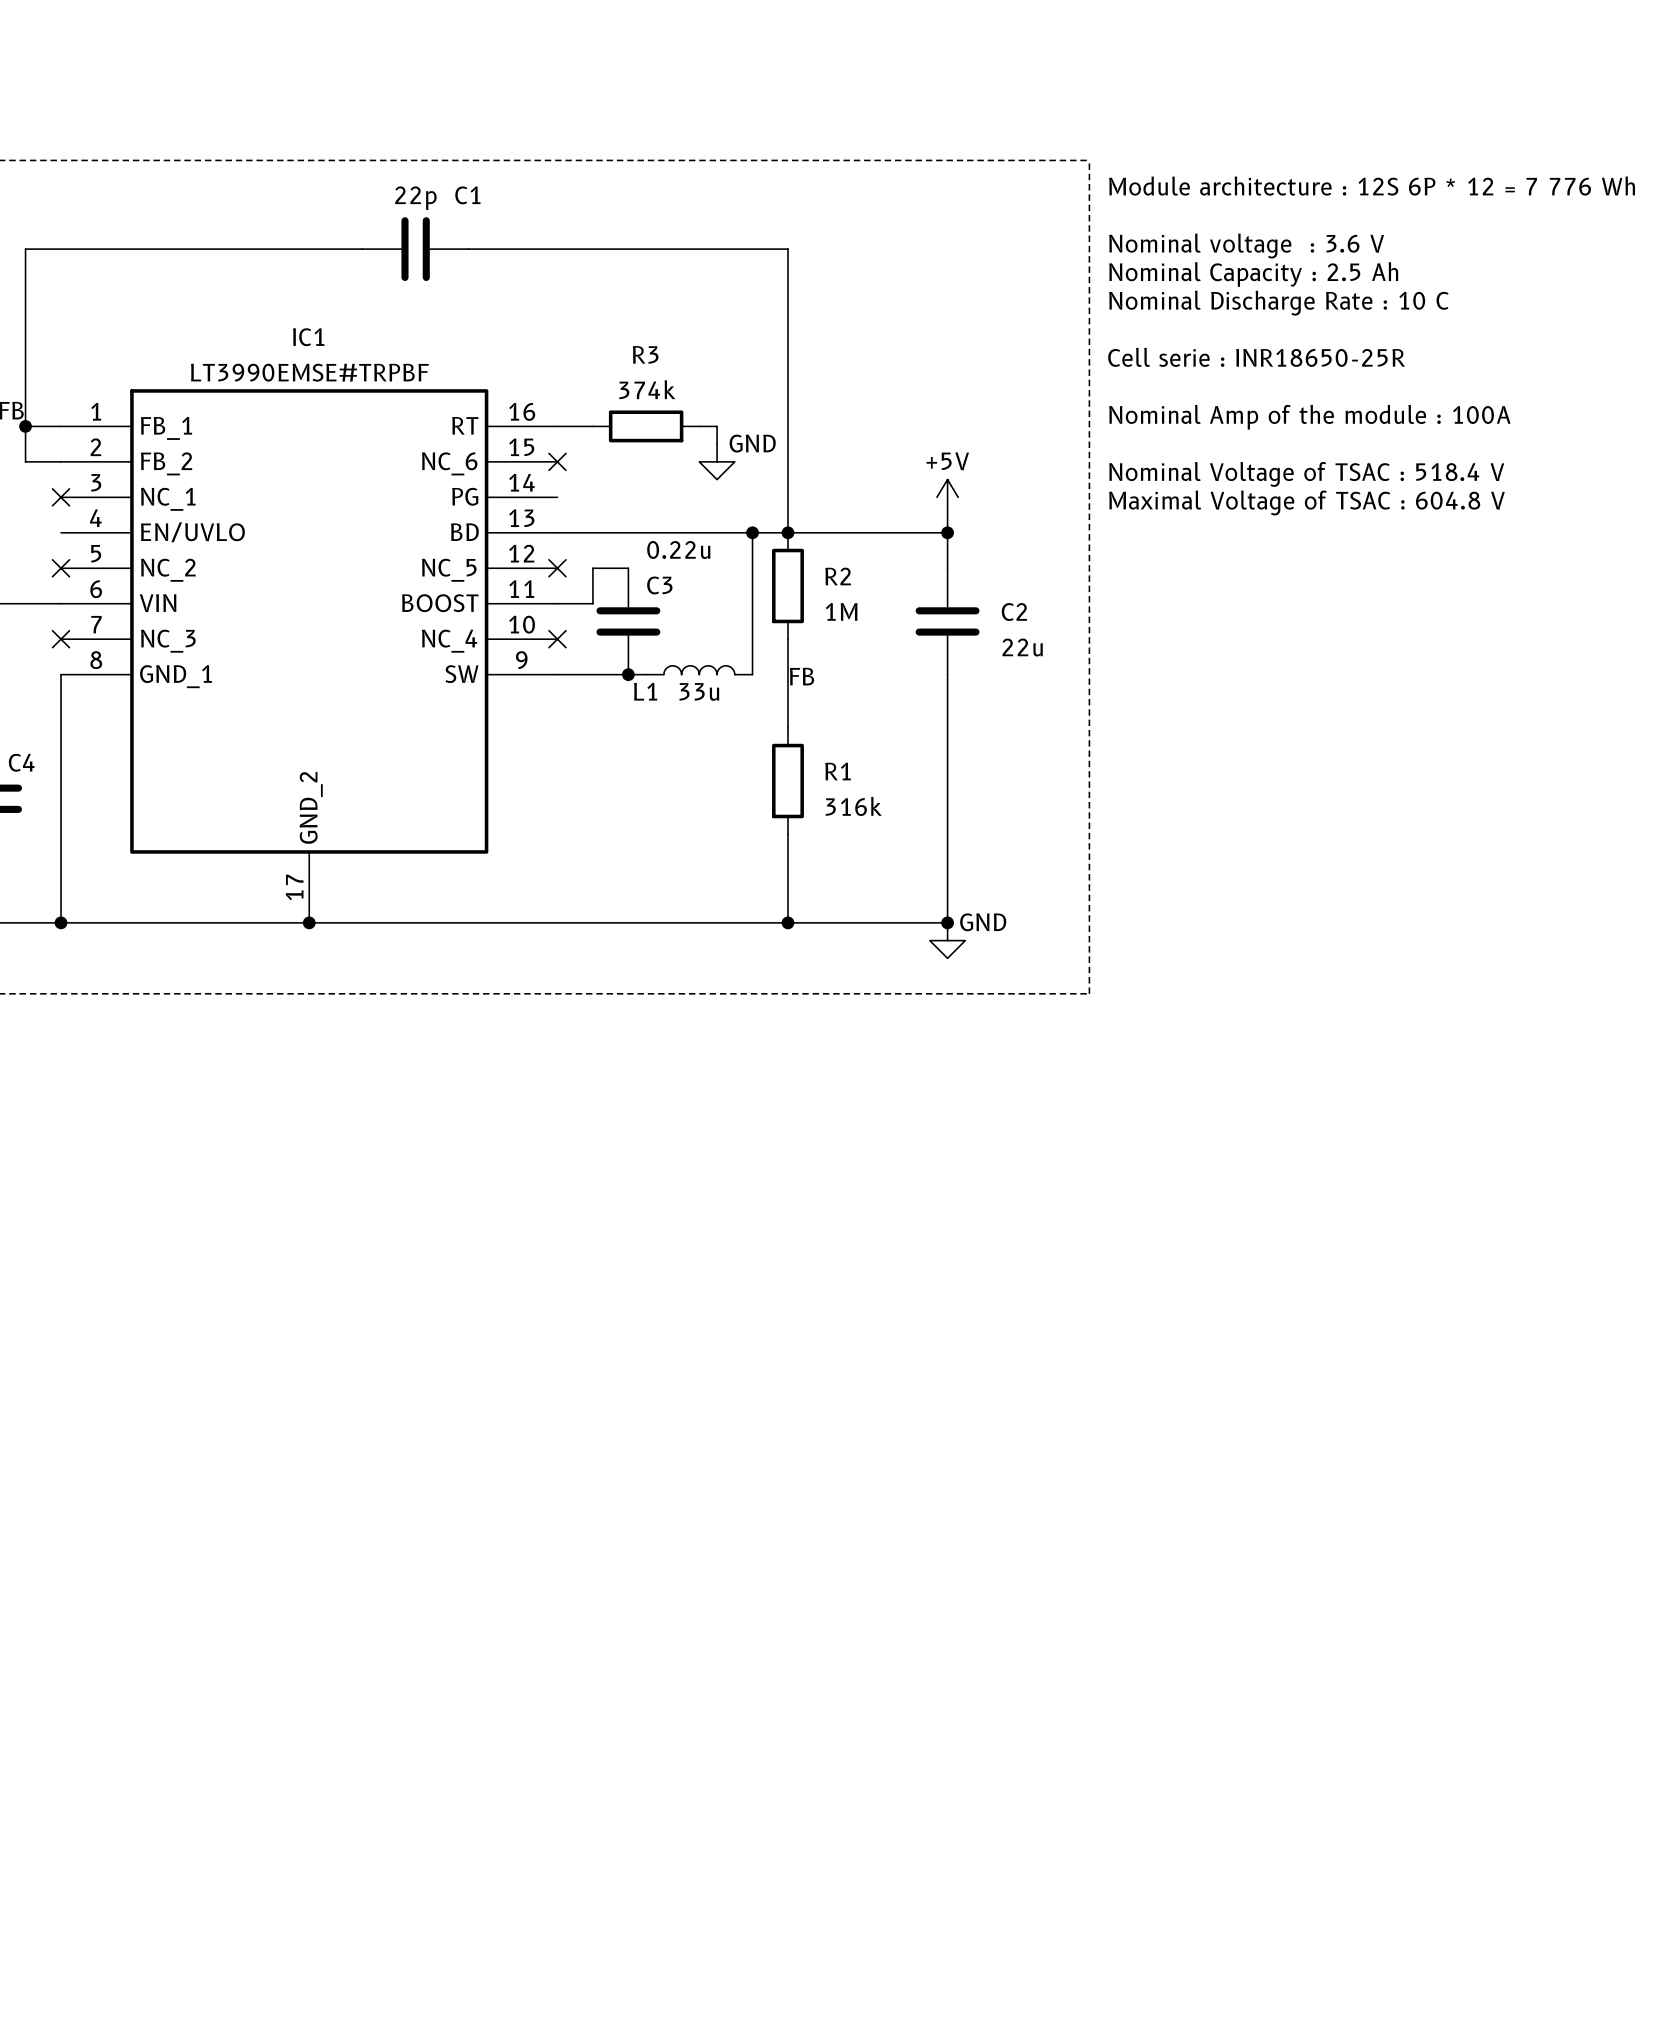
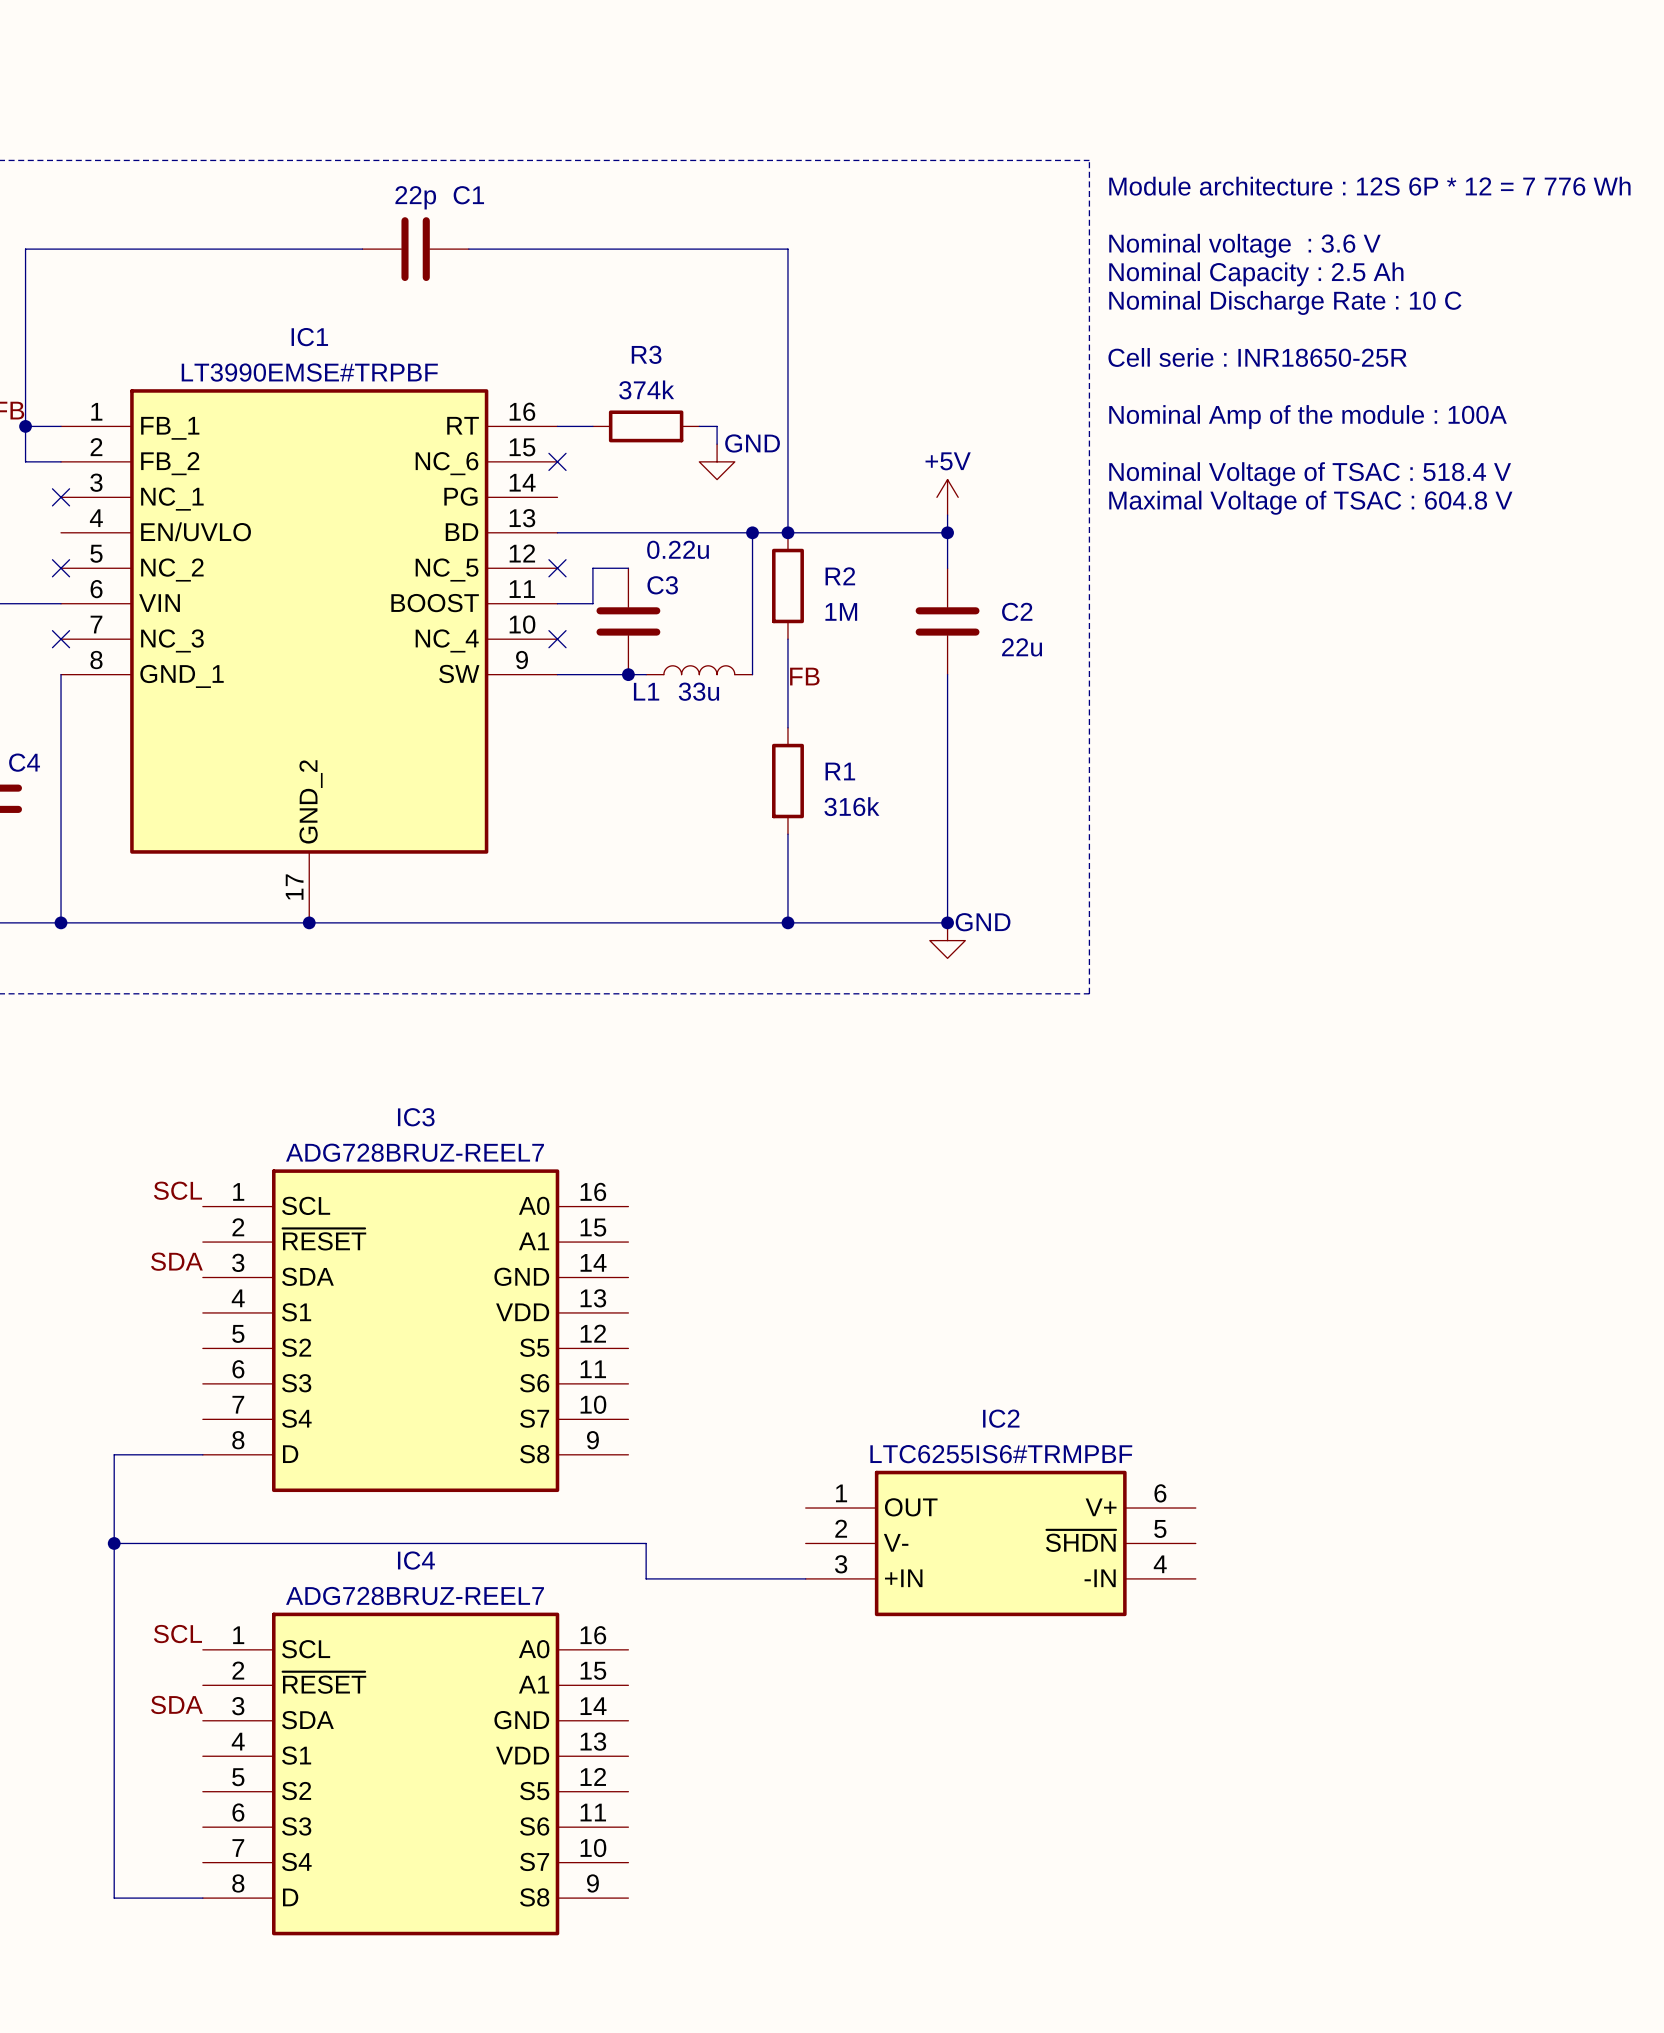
label: none -> SCL (177, 1190)
label: none -> SDA (176, 1261)
IC3: none -> ADG728BRUZ-REEL7 (415, 1330)
wire: none -> (202, 1454) (114, 1454) (114, 1898) (202, 1898)
wire: none -> (114, 1543) (646, 1543) (646, 1578) (805, 1578)
junction: none -> (114, 1543)
IC2: none -> LTC6255IS6#TRMPBF (1000, 1543)
label: none -> SCL (177, 1634)
label: none -> SDA (176, 1704)
IC4: none -> ADG728BRUZ-REEL7 (415, 1773)

